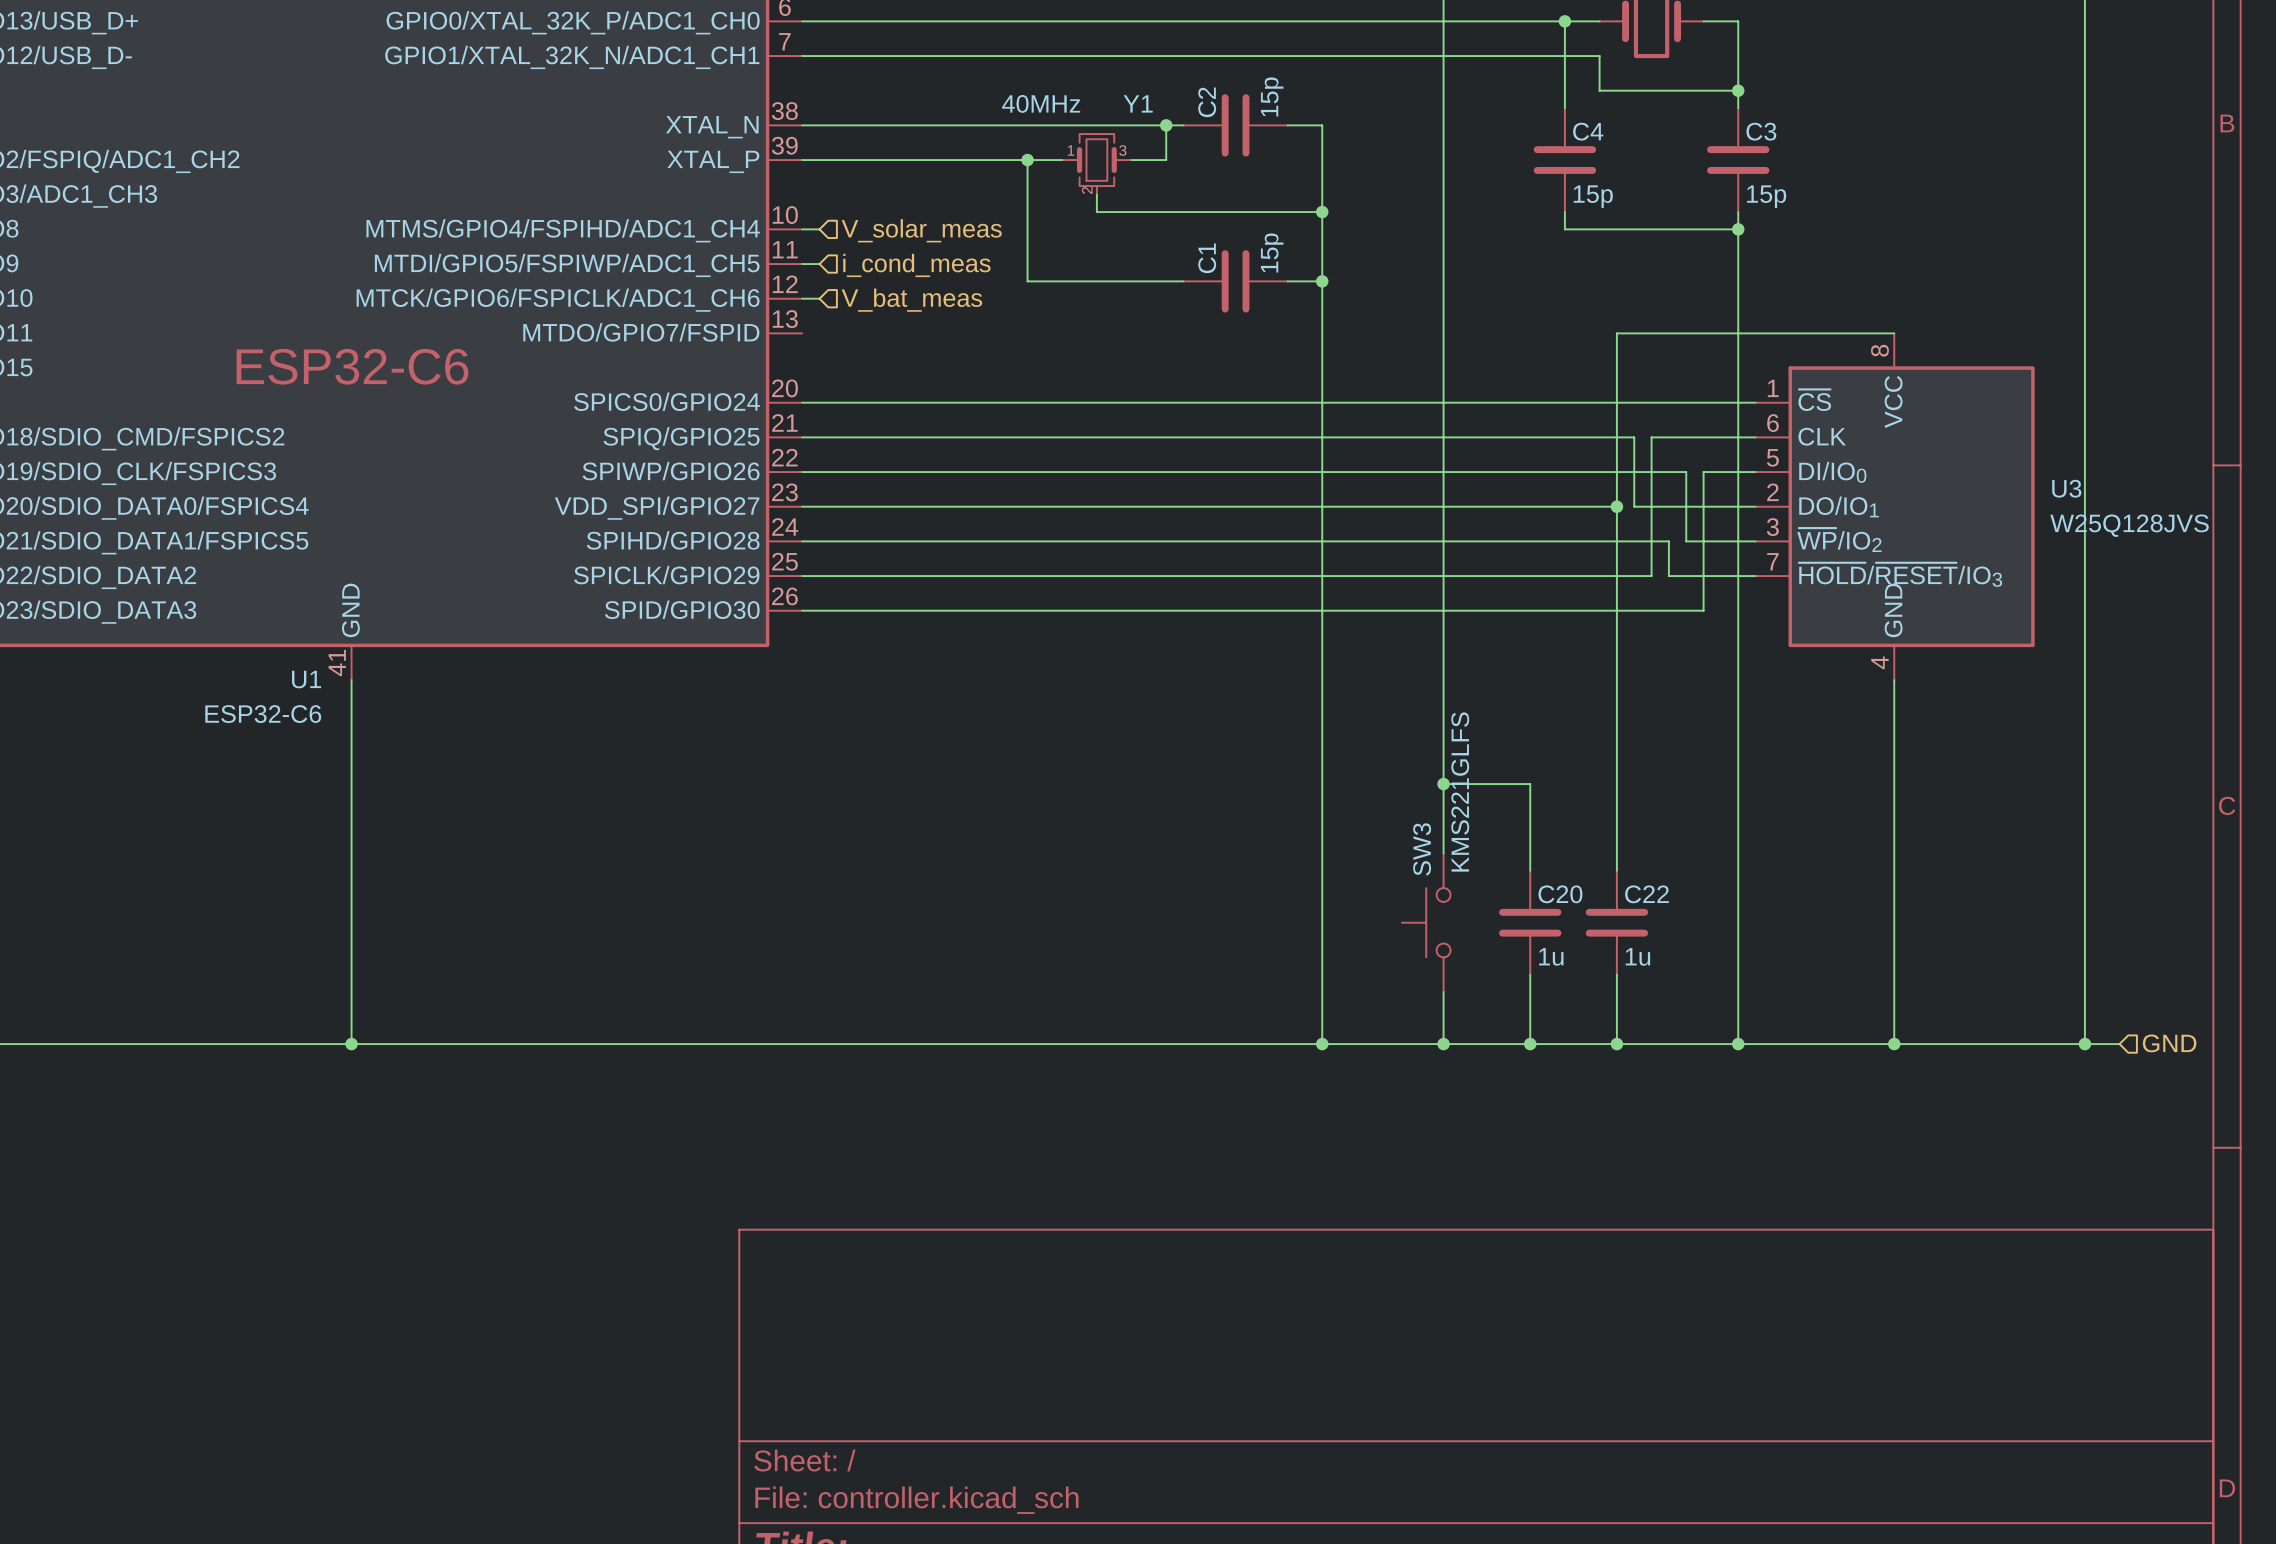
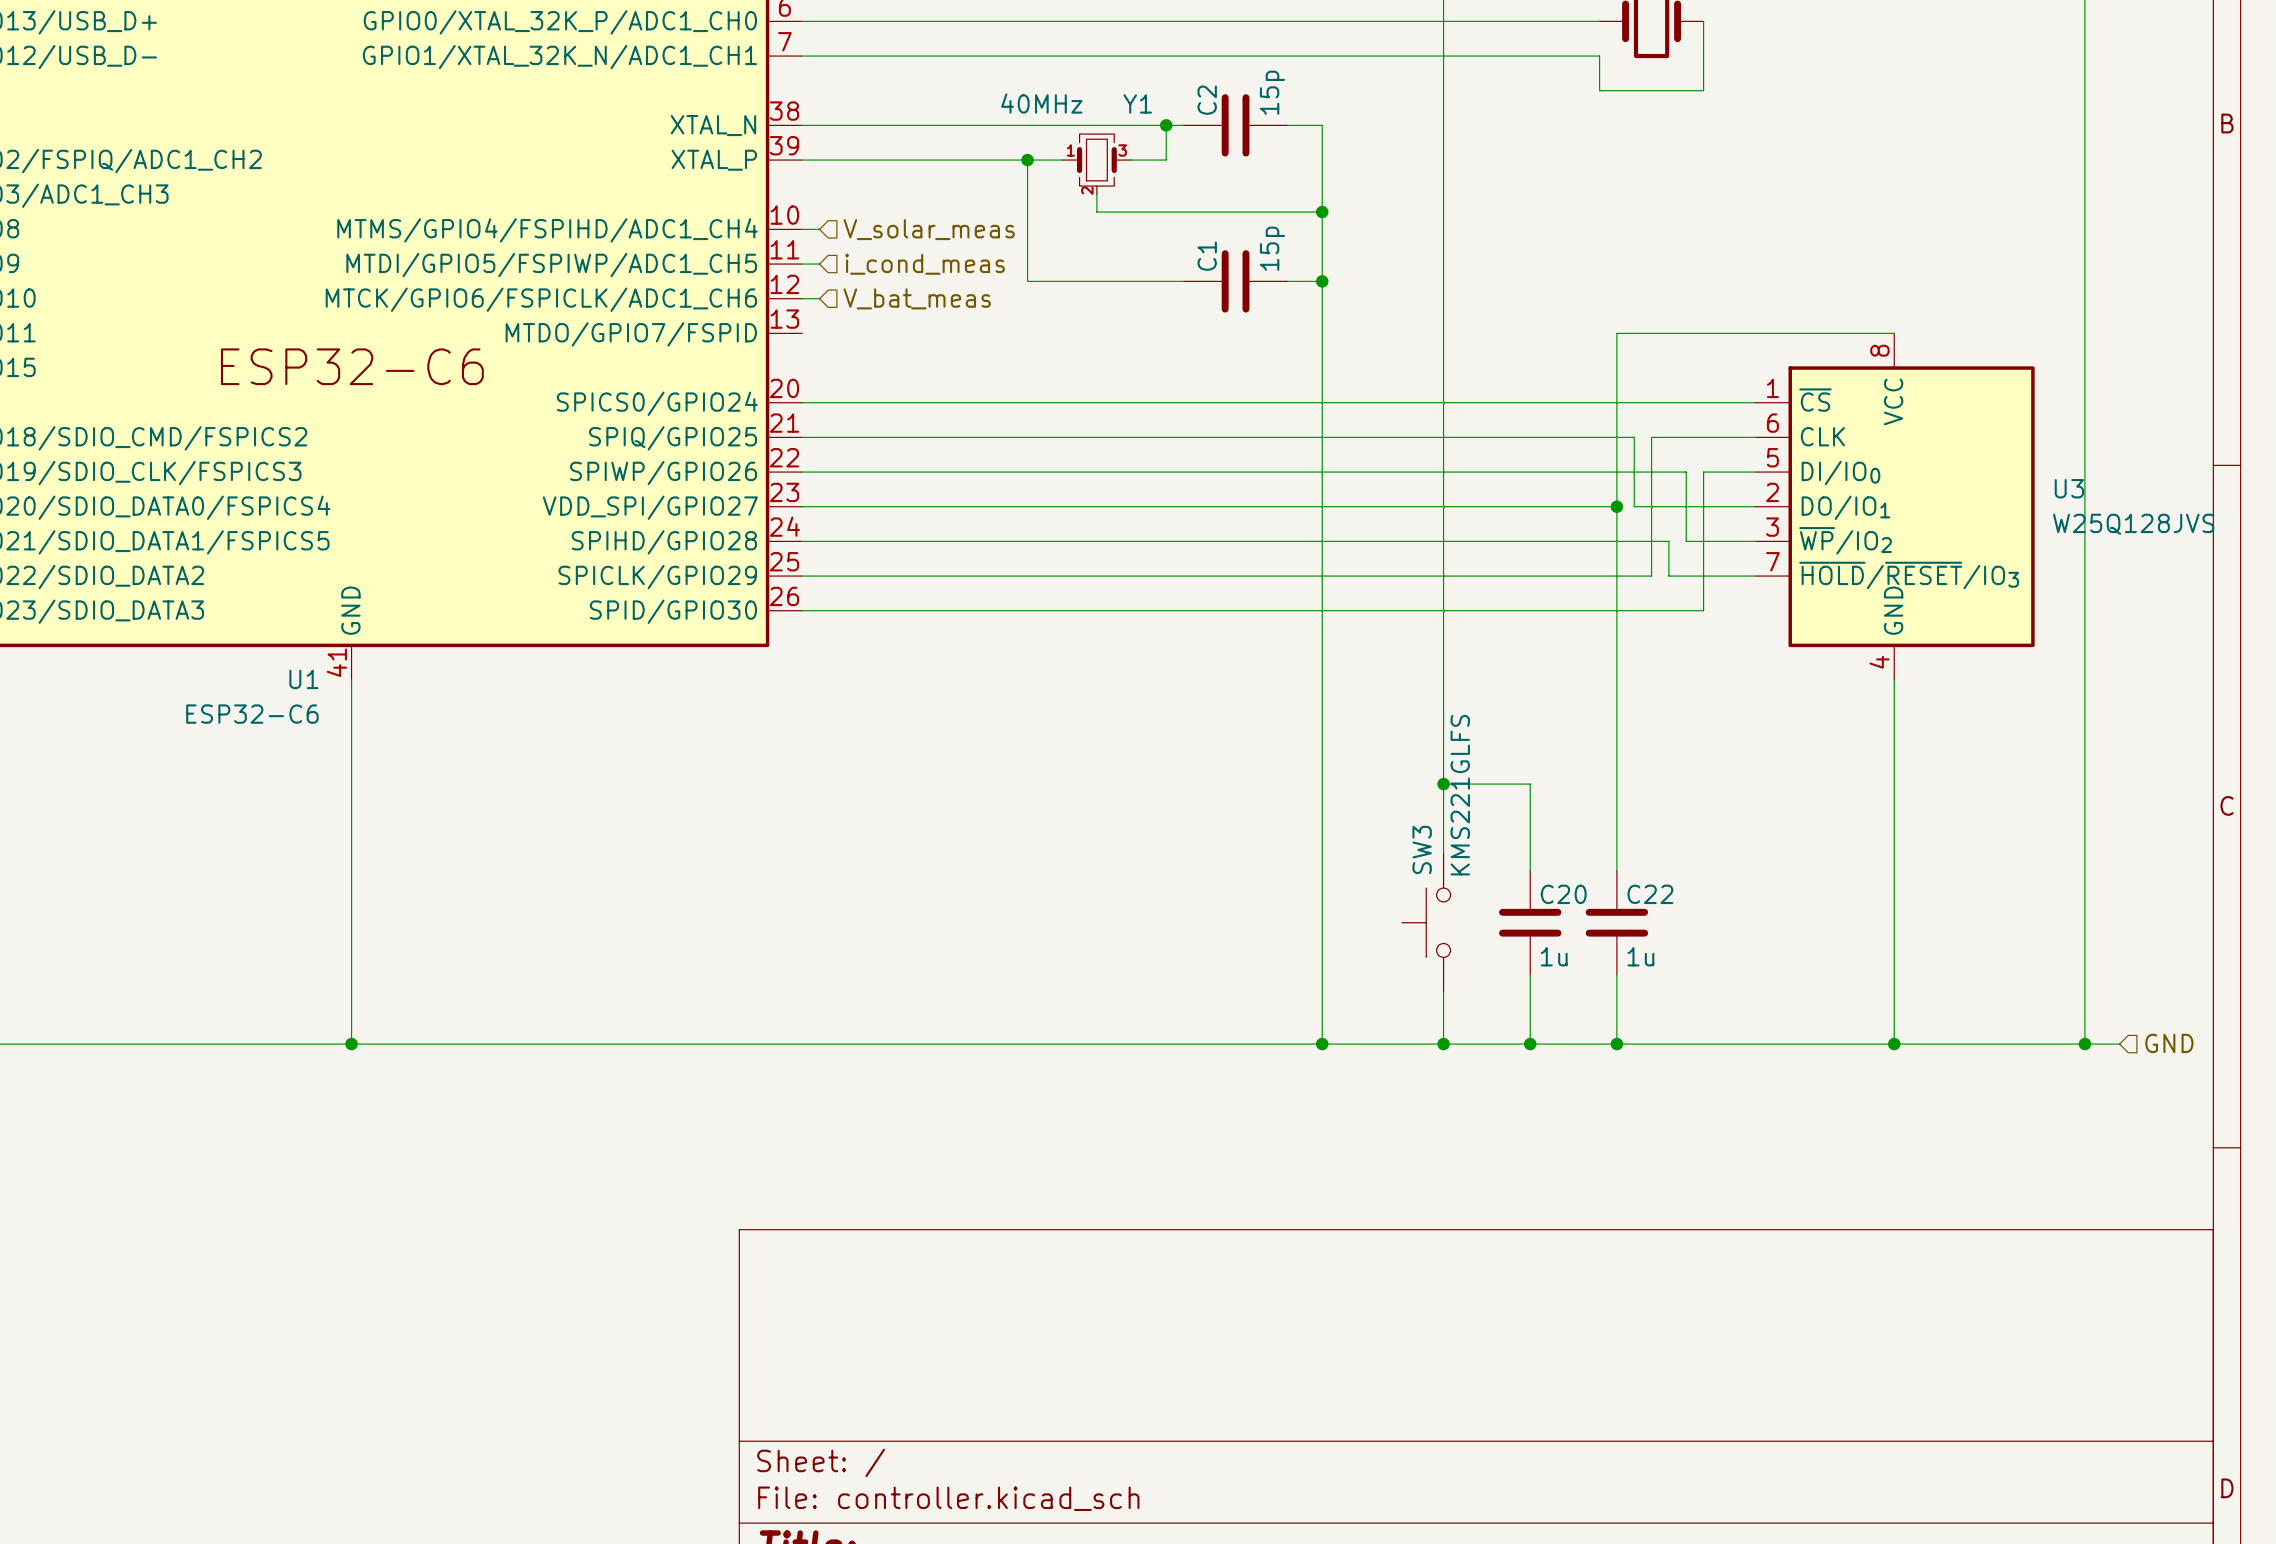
wire: (1564, 21) (1564, 108) -> none
junction: (1564, 21) -> none
wire: (1703, 21) (1738, 21) (1738, 108) -> (1703, 21) (1703, 90)
wire: (1703, 90) (1738, 90) -> none
junction: (1738, 90) -> none
C4: 15p (1564, 160) -> none
C3: 15p (1738, 160) -> none
wire: (1564, 212) (1564, 229) (1738, 229) -> none
wire: (1738, 212) (1738, 1044) -> none
junction: (1738, 229) -> none
junction: (1738, 1044) -> none

